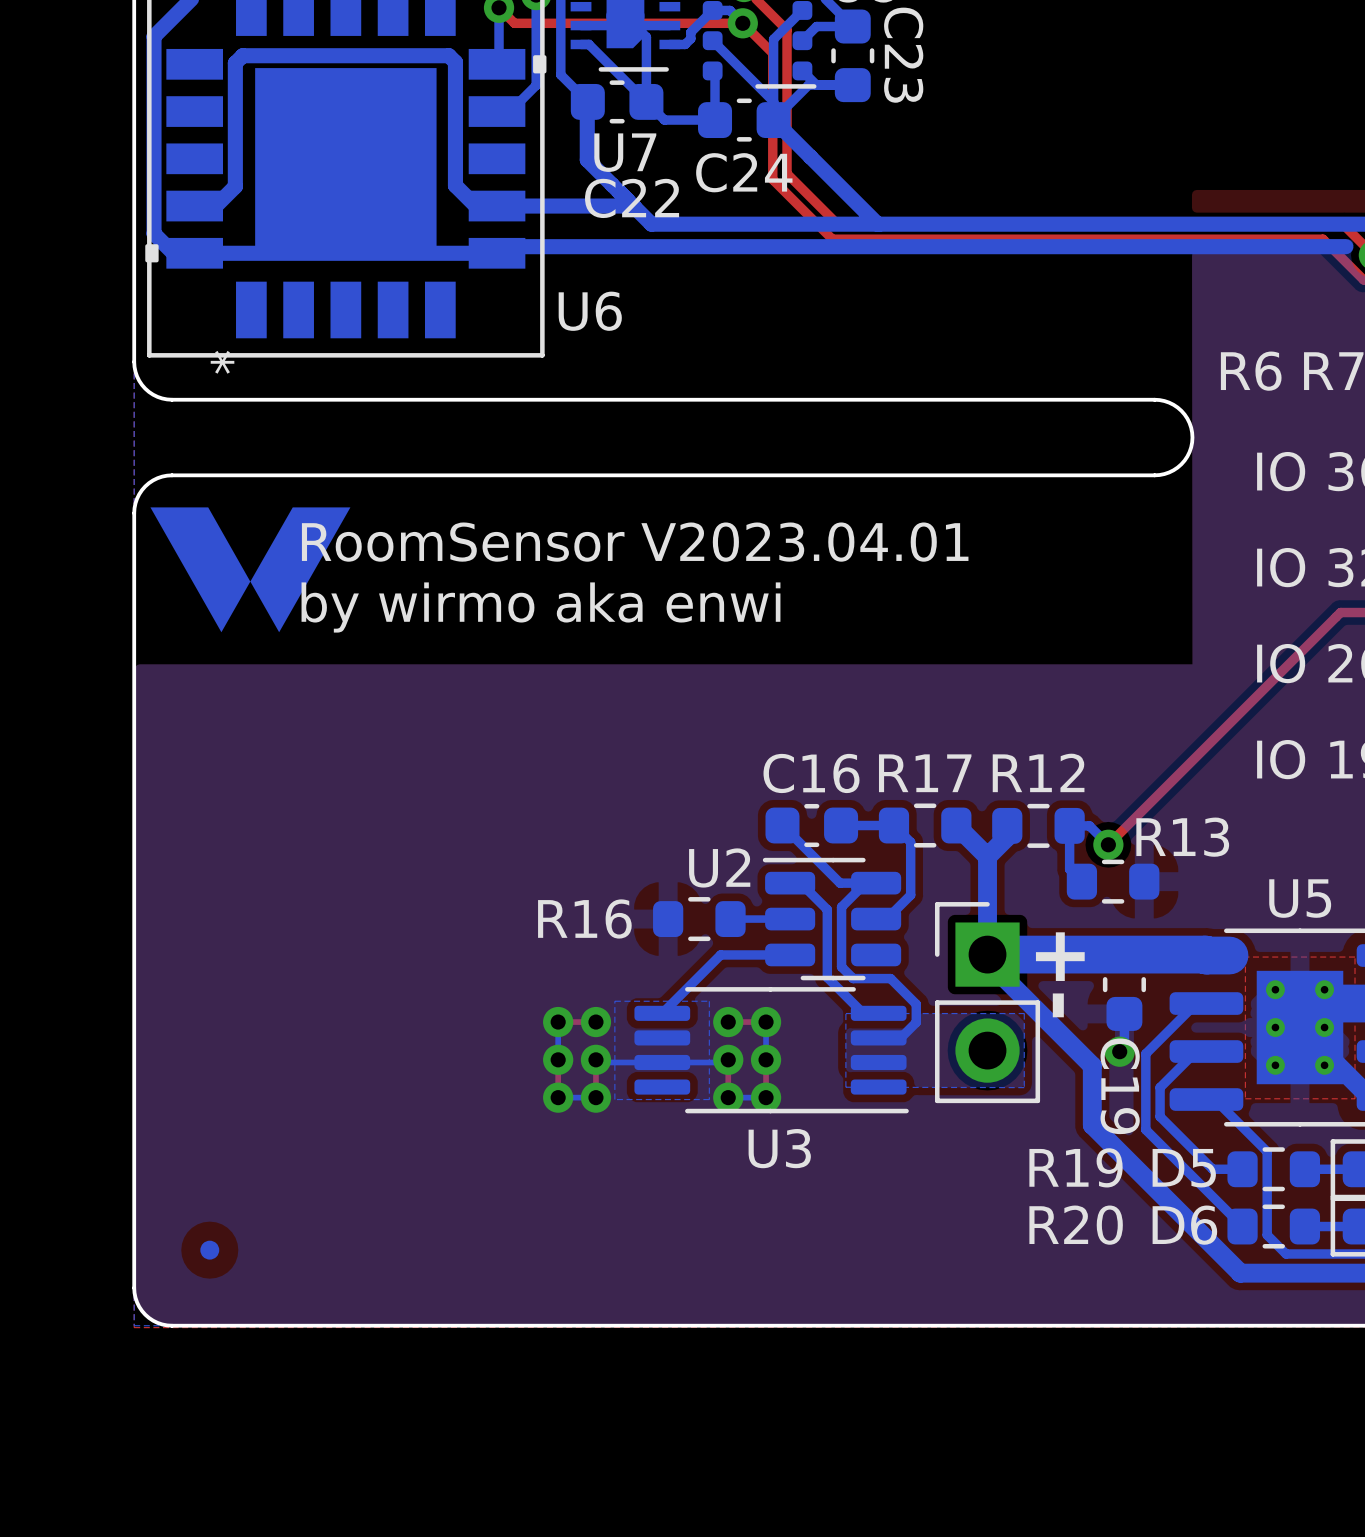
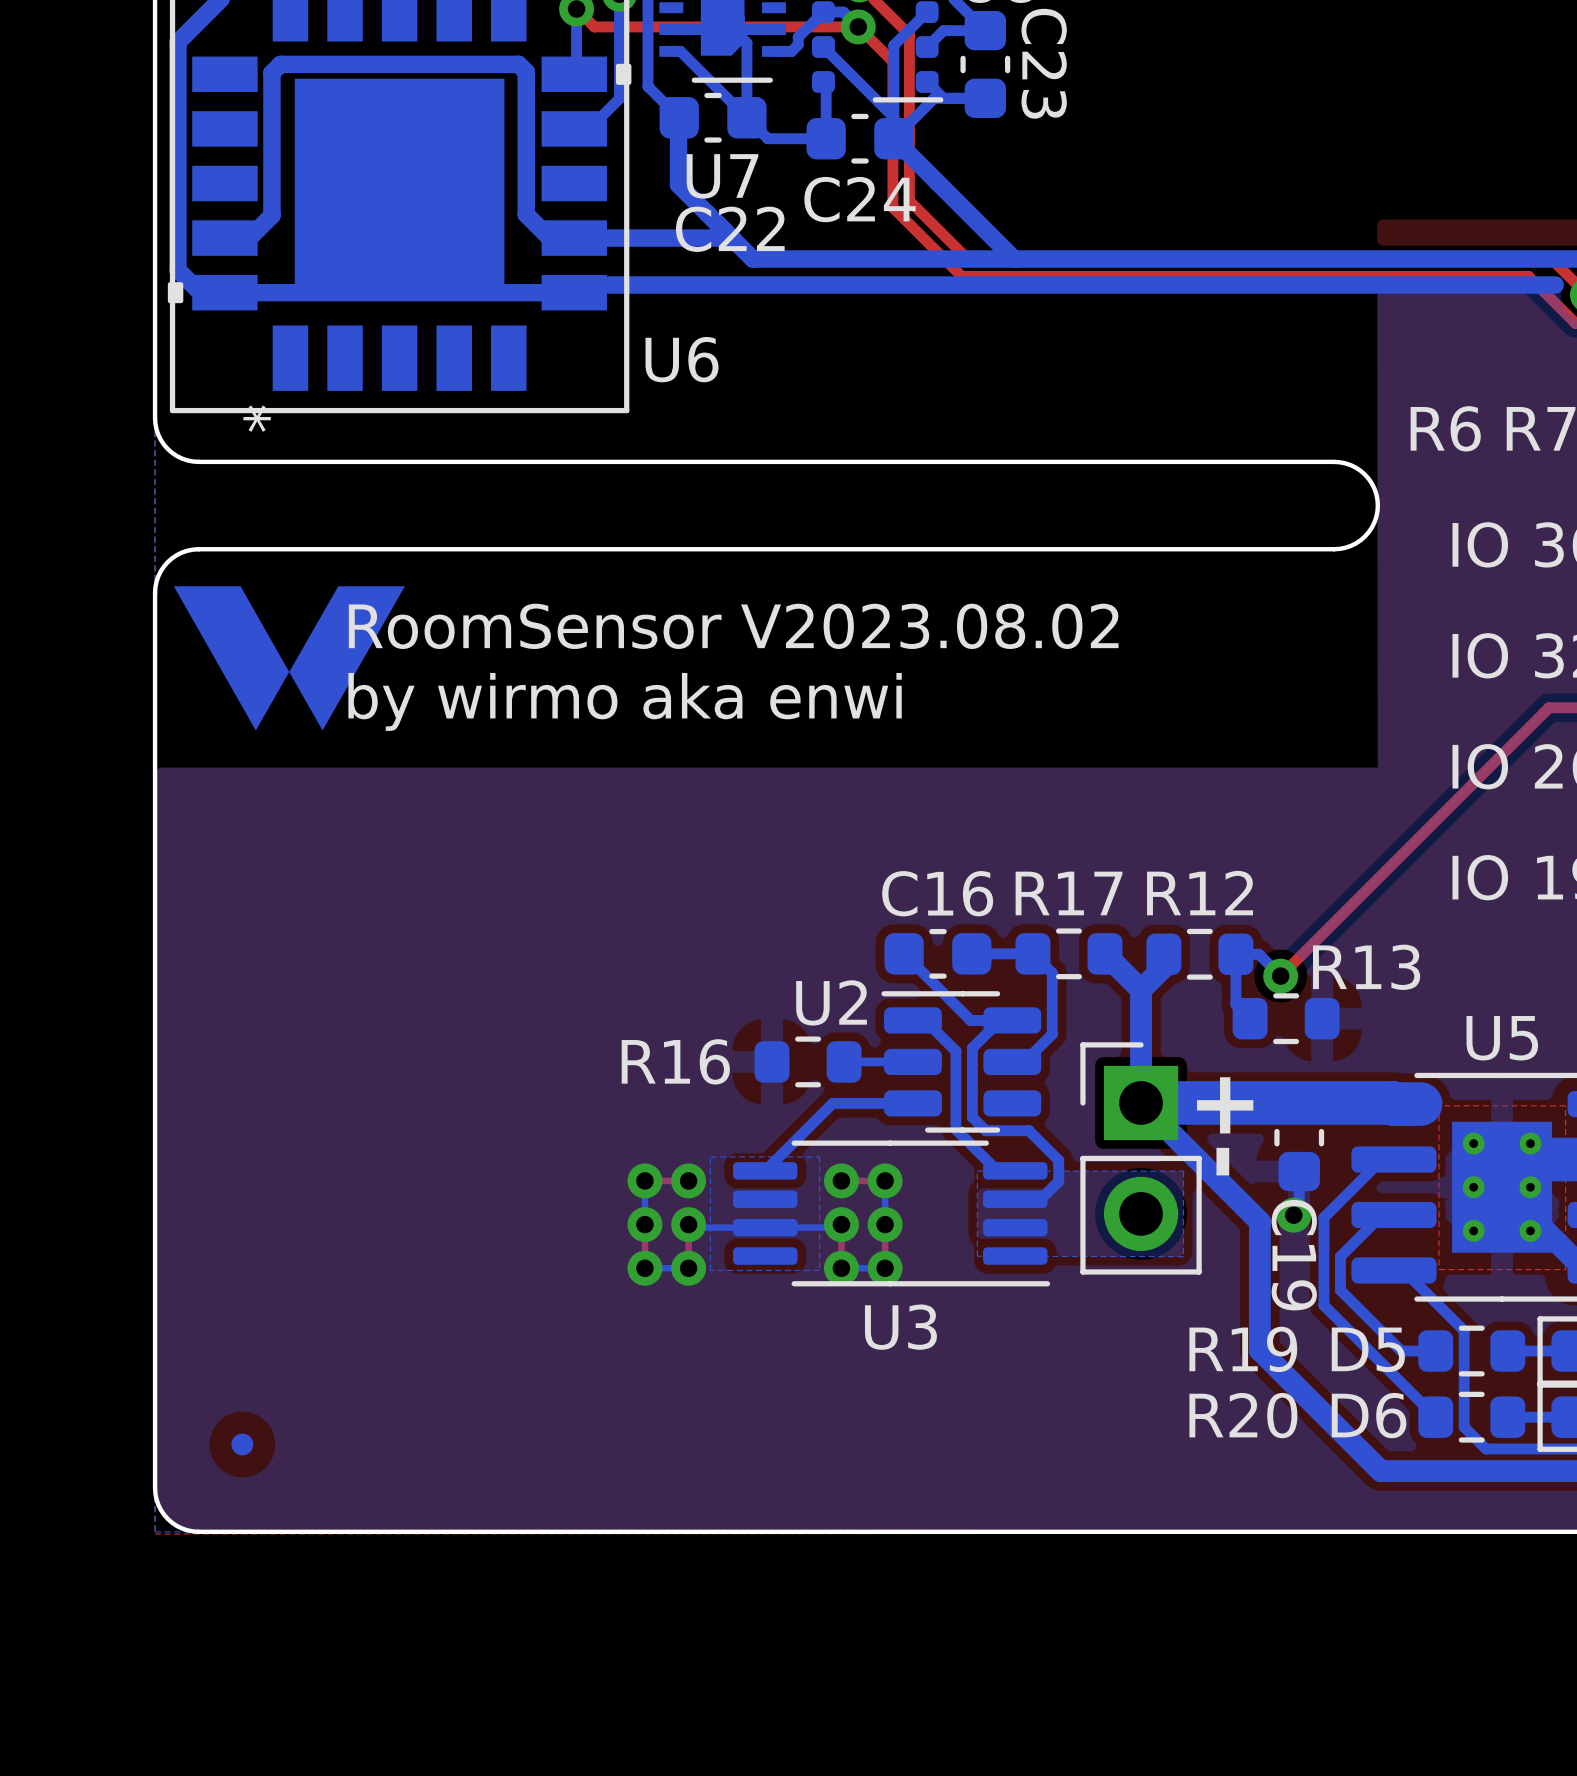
text: RoomSensor V2023.04.01 (635, 542) -> RoomSensor V2023.08.02 (733, 626)
bottom track: (987, 961) (1092, 1065) (1092, 1125) (1240, 1273) -> (1141, 1102) (1259, 1221) (1259, 1350) (1380, 1471) (1433, 1471)

